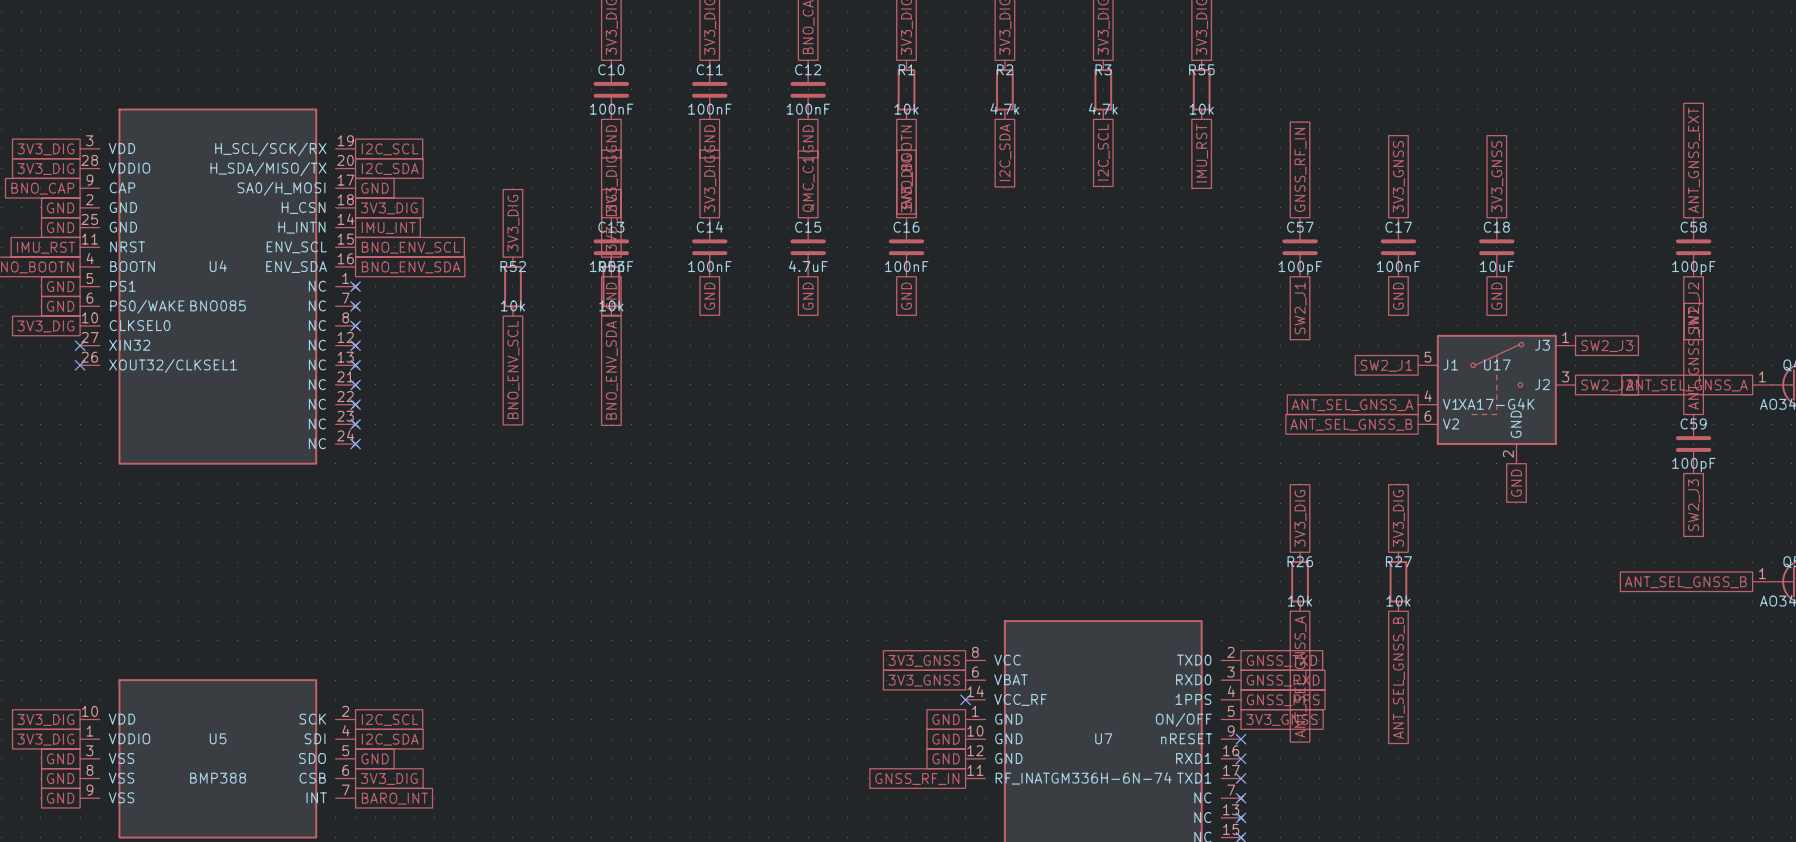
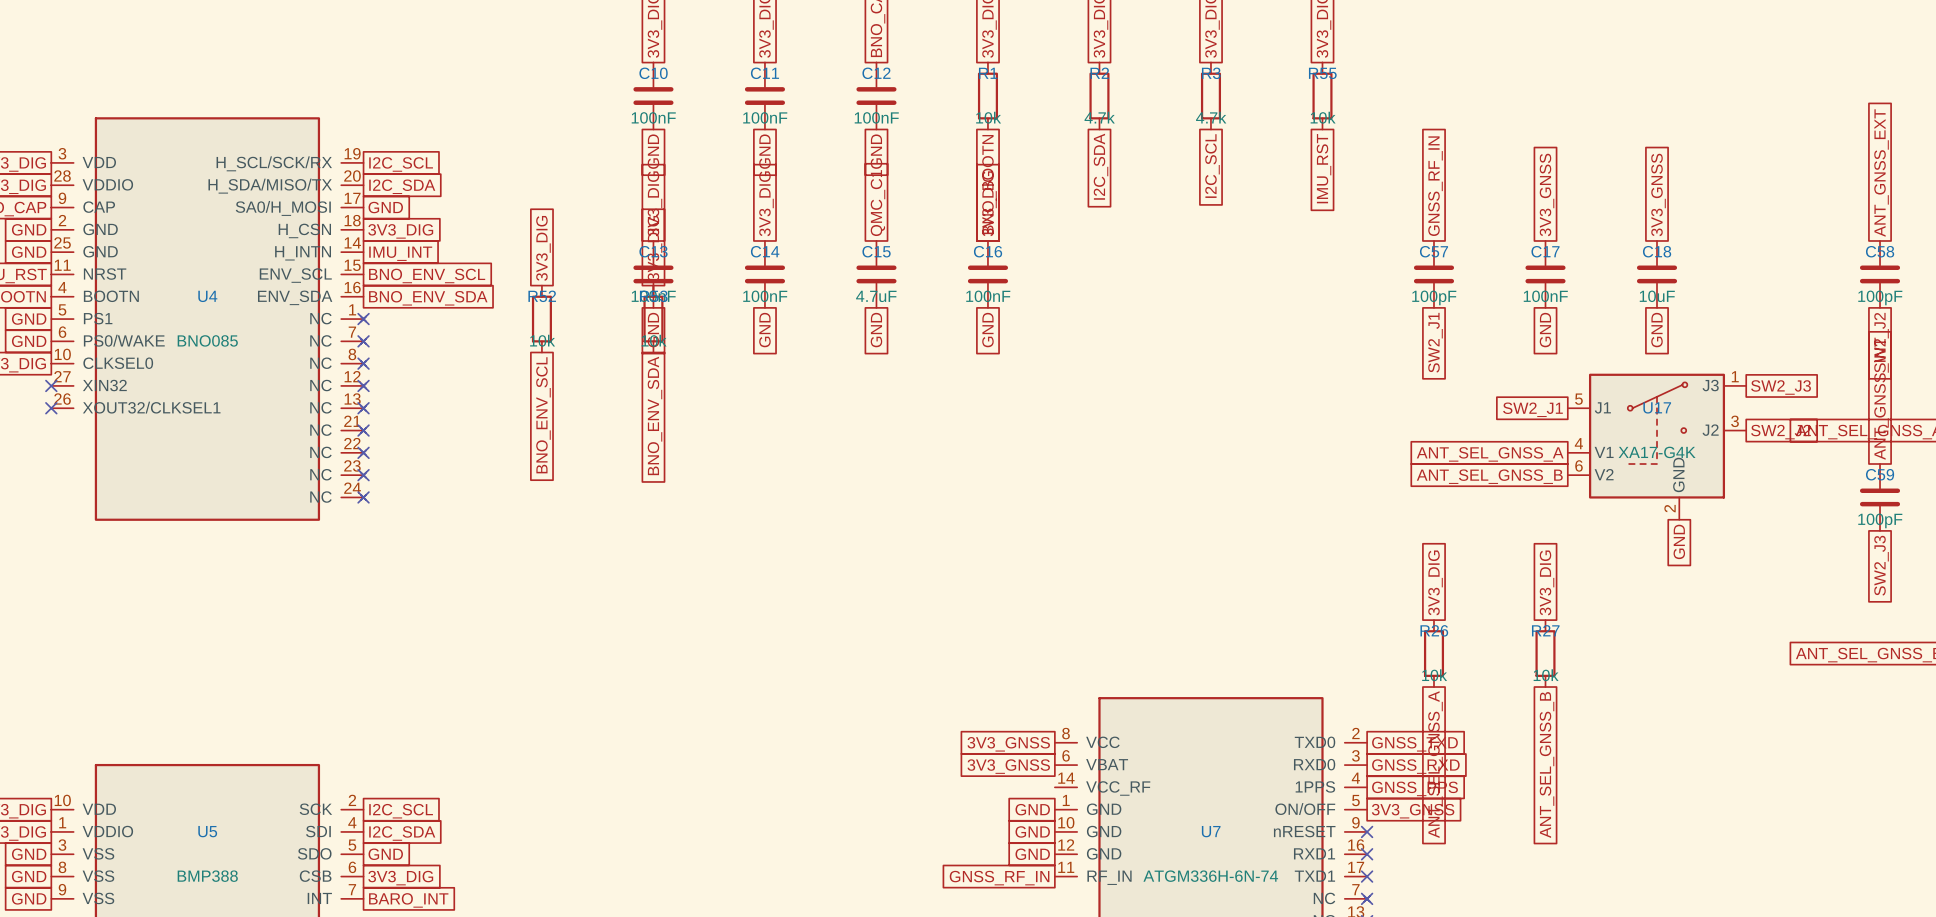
no-connect mark: (965, 699) -> none

